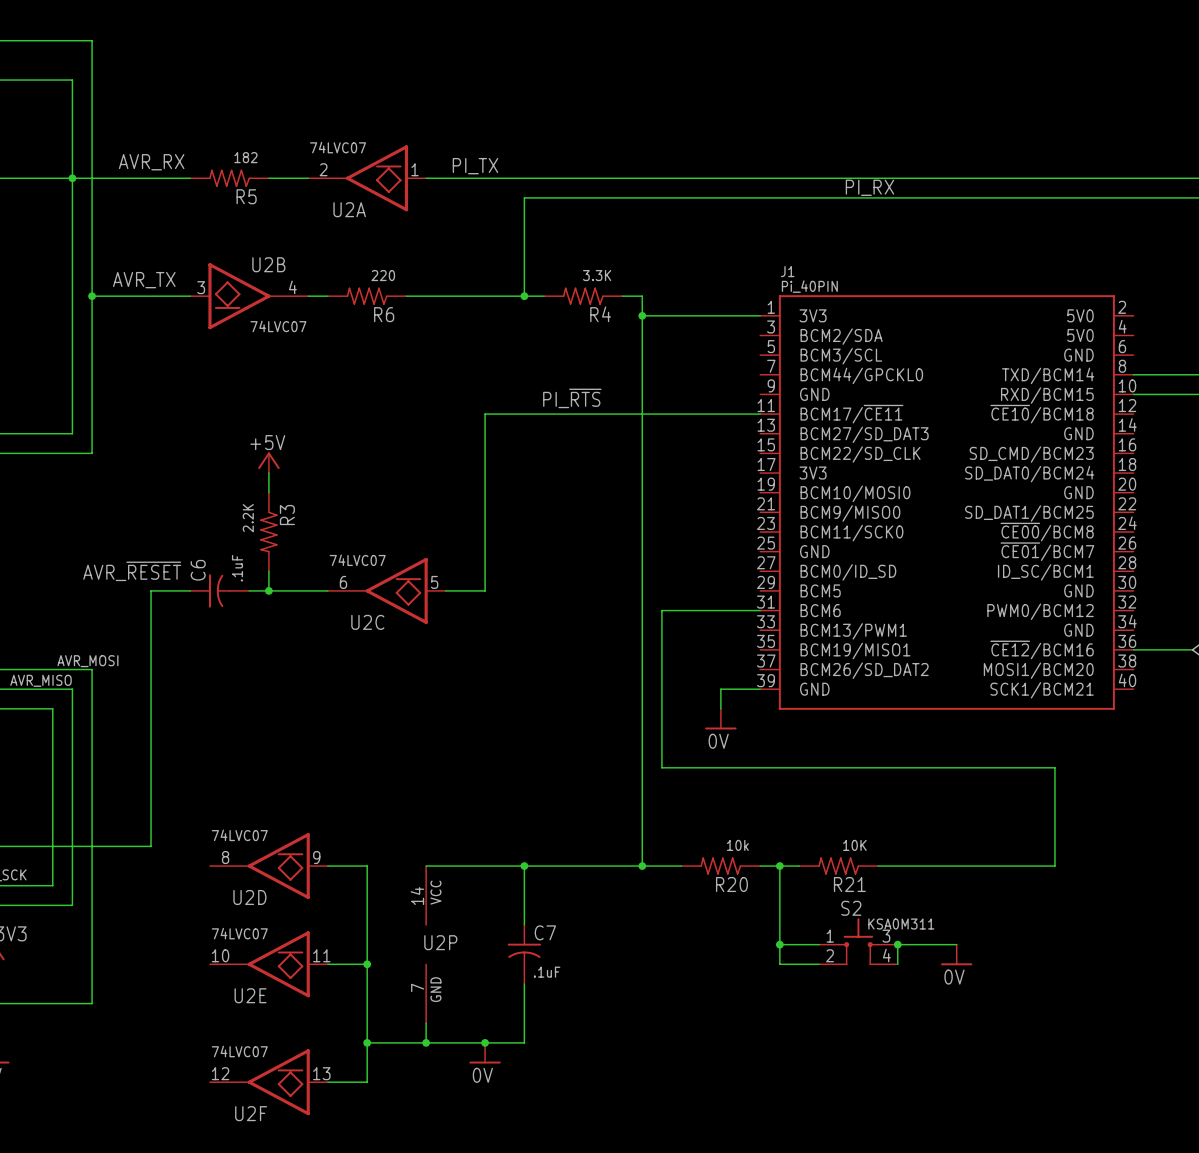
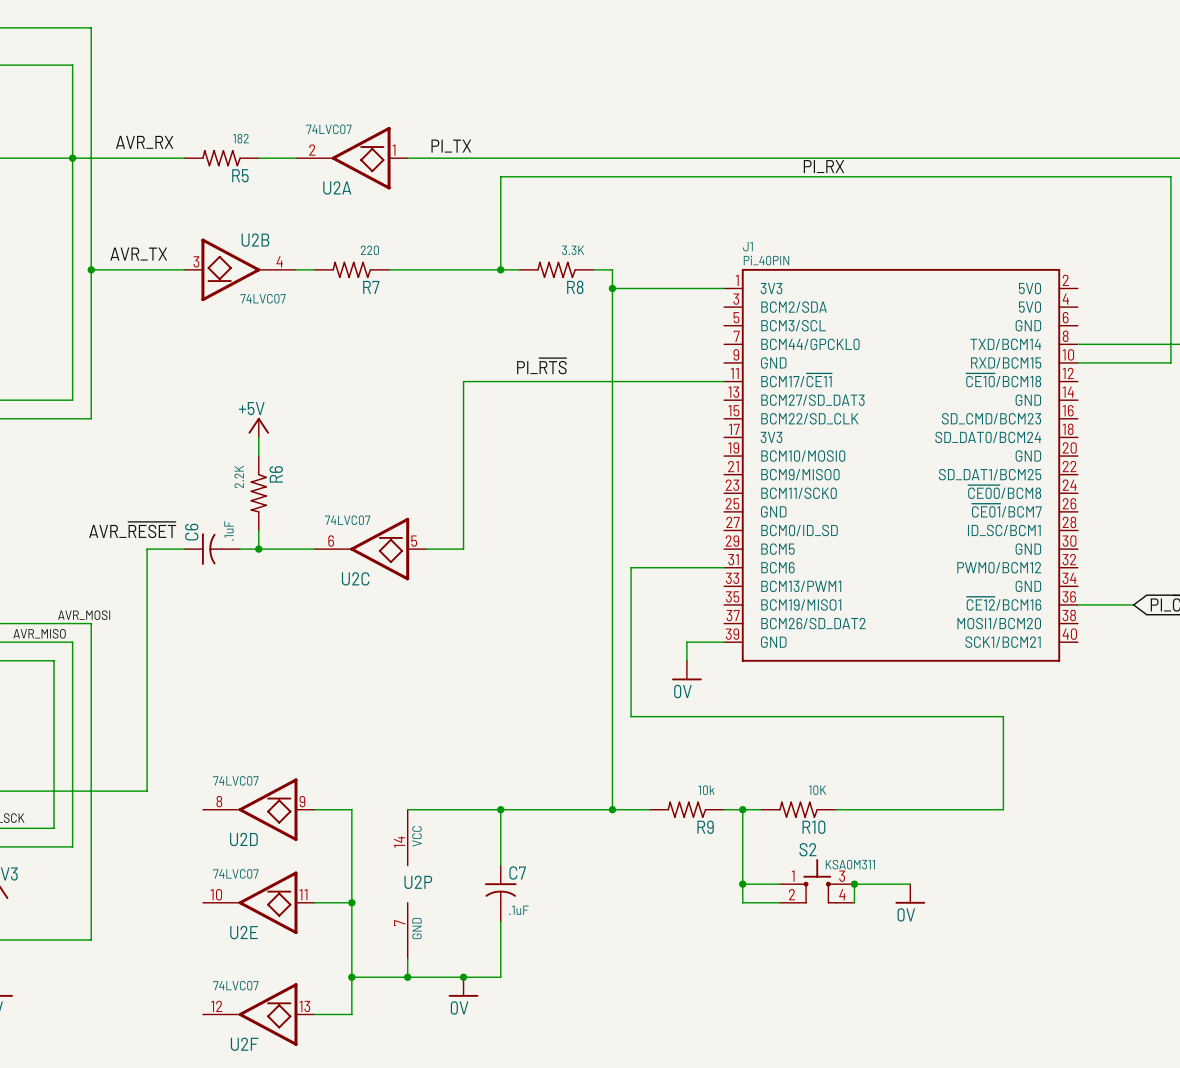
R6 name: R6 (384, 314) -> R7 (371, 287)
R4 name: R4 (600, 314) -> R8 (575, 287)
R3 name: R3 (287, 515) -> R6 (276, 474)
R20 name: R20 (731, 884) -> R9 (705, 827)
R21 name: R21 (849, 884) -> R10 (813, 827)

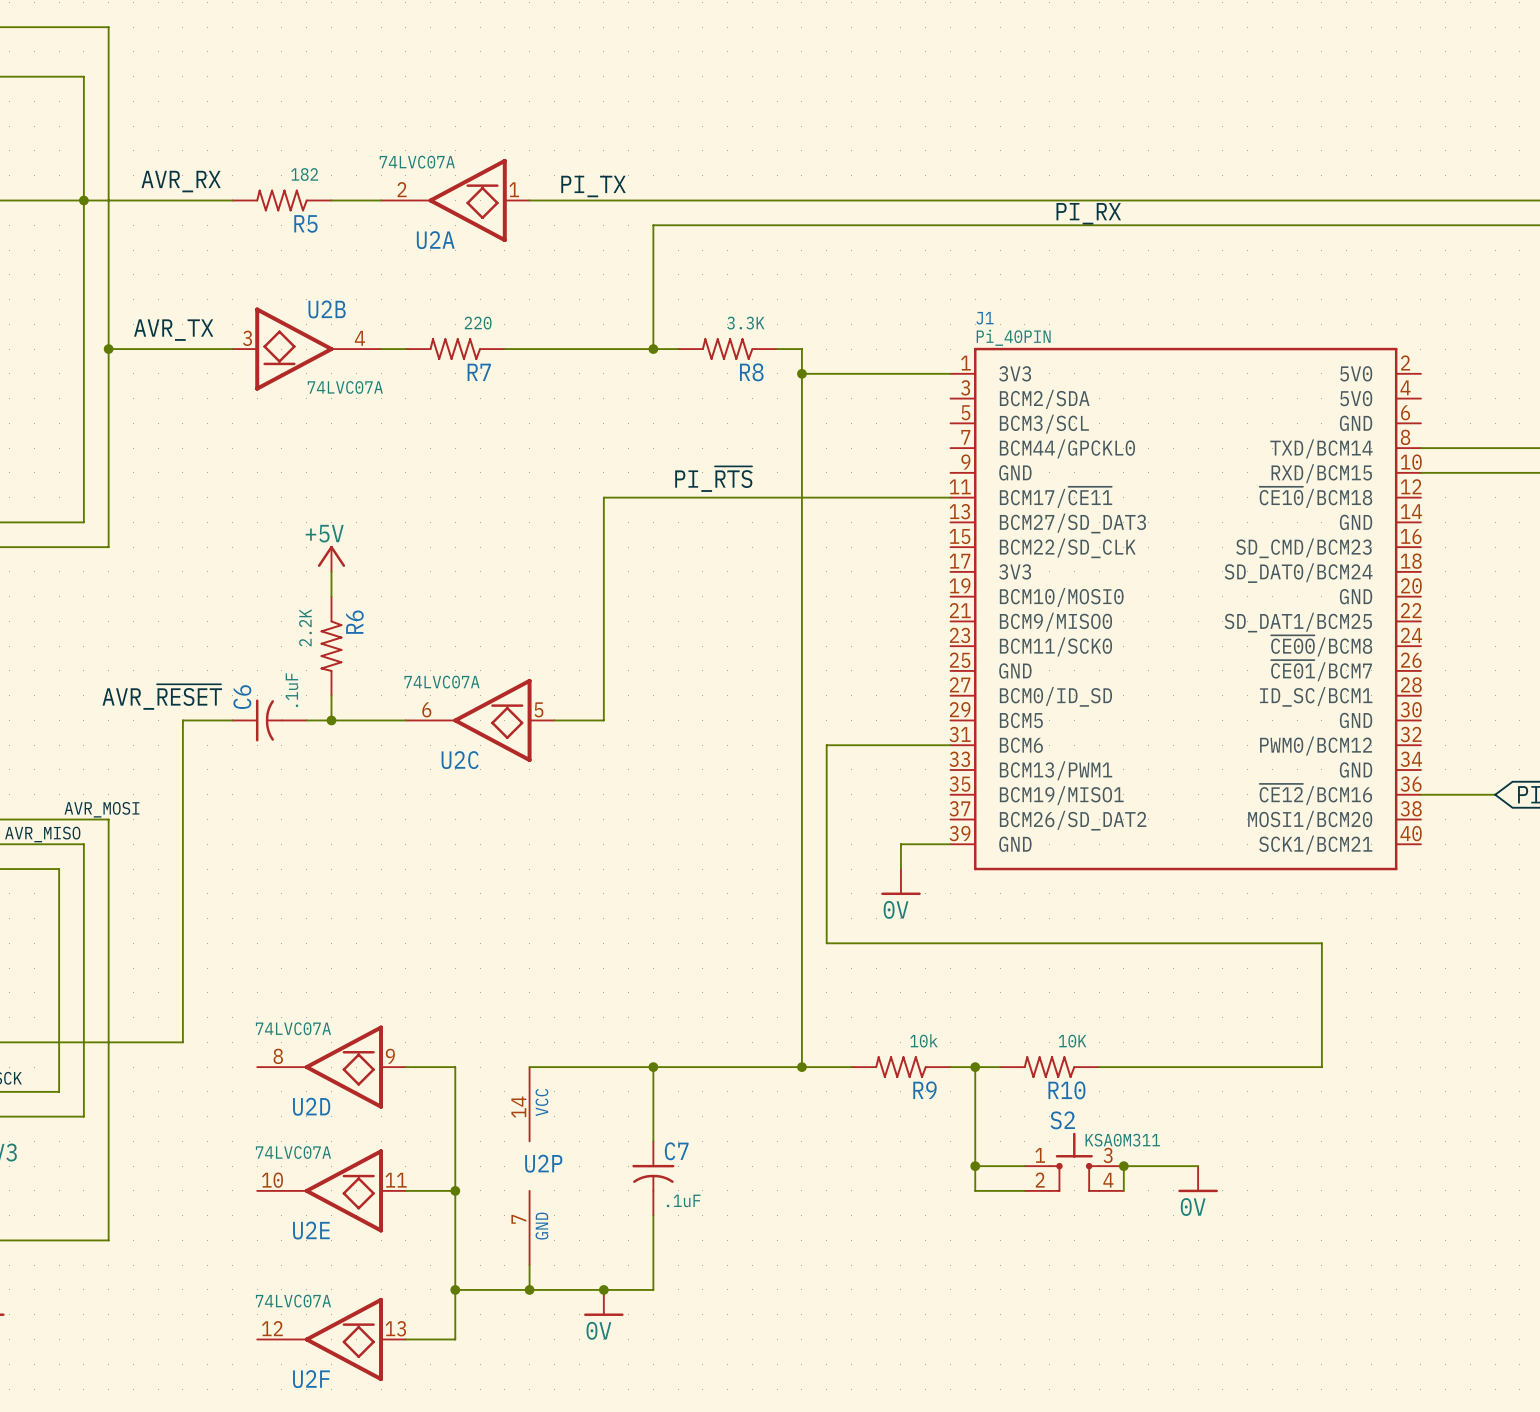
U2A value: 74LVC07 (329, 129) -> 74LVC07A (417, 162)
U2B value: 74LVC07 (263, 298) -> 74LVC07A (345, 387)
U2C value: 74LVC07 (347, 520) -> 74LVC07A (442, 682)
U2D value: 74LVC07 (235, 780) -> 74LVC07A (293, 1028)
U2E value: 74LVC07 (235, 873) -> 74LVC07A (293, 1152)
U2F value: 74LVC07 (235, 985) -> 74LVC07A (293, 1301)

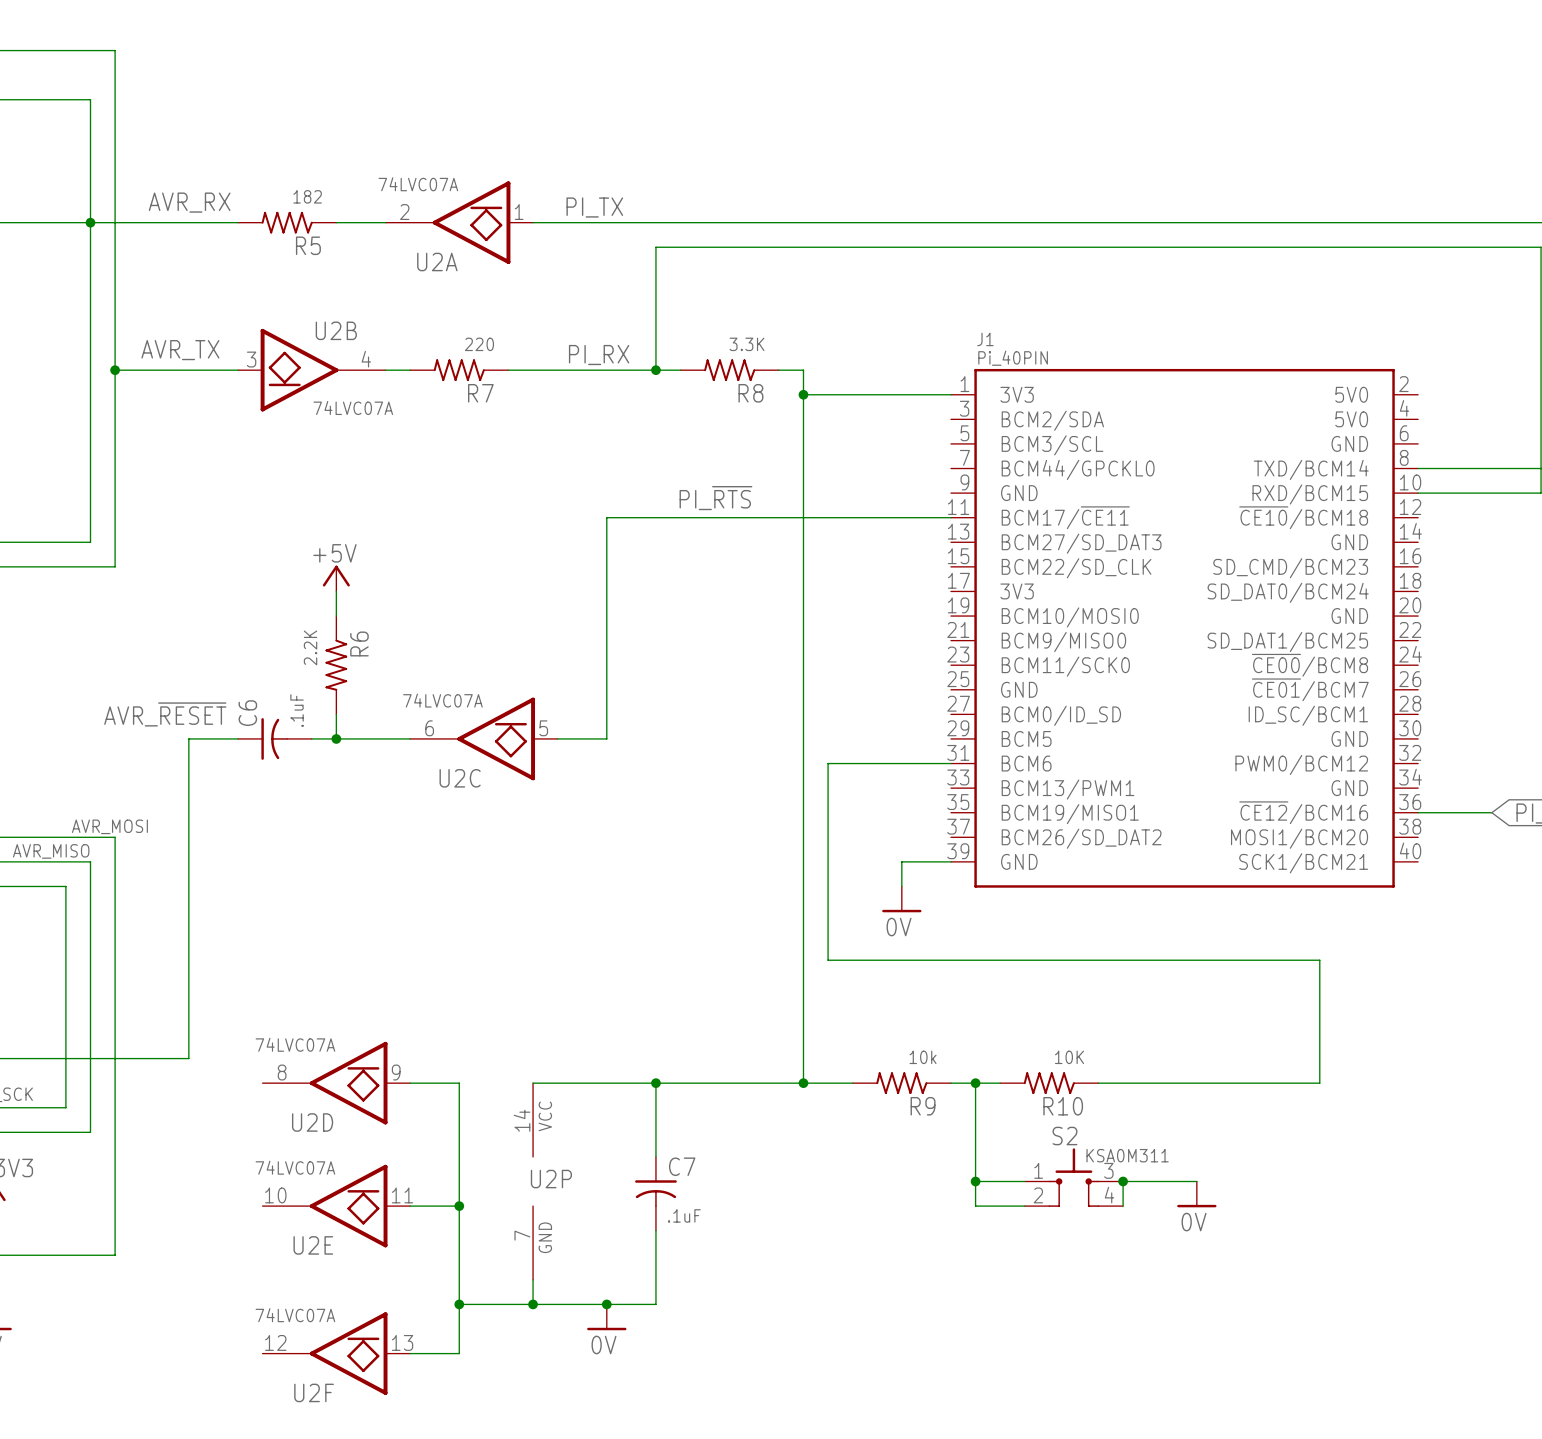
label: PI_RX (1088, 213) -> none
label: none -> PI_RX (599, 355)

